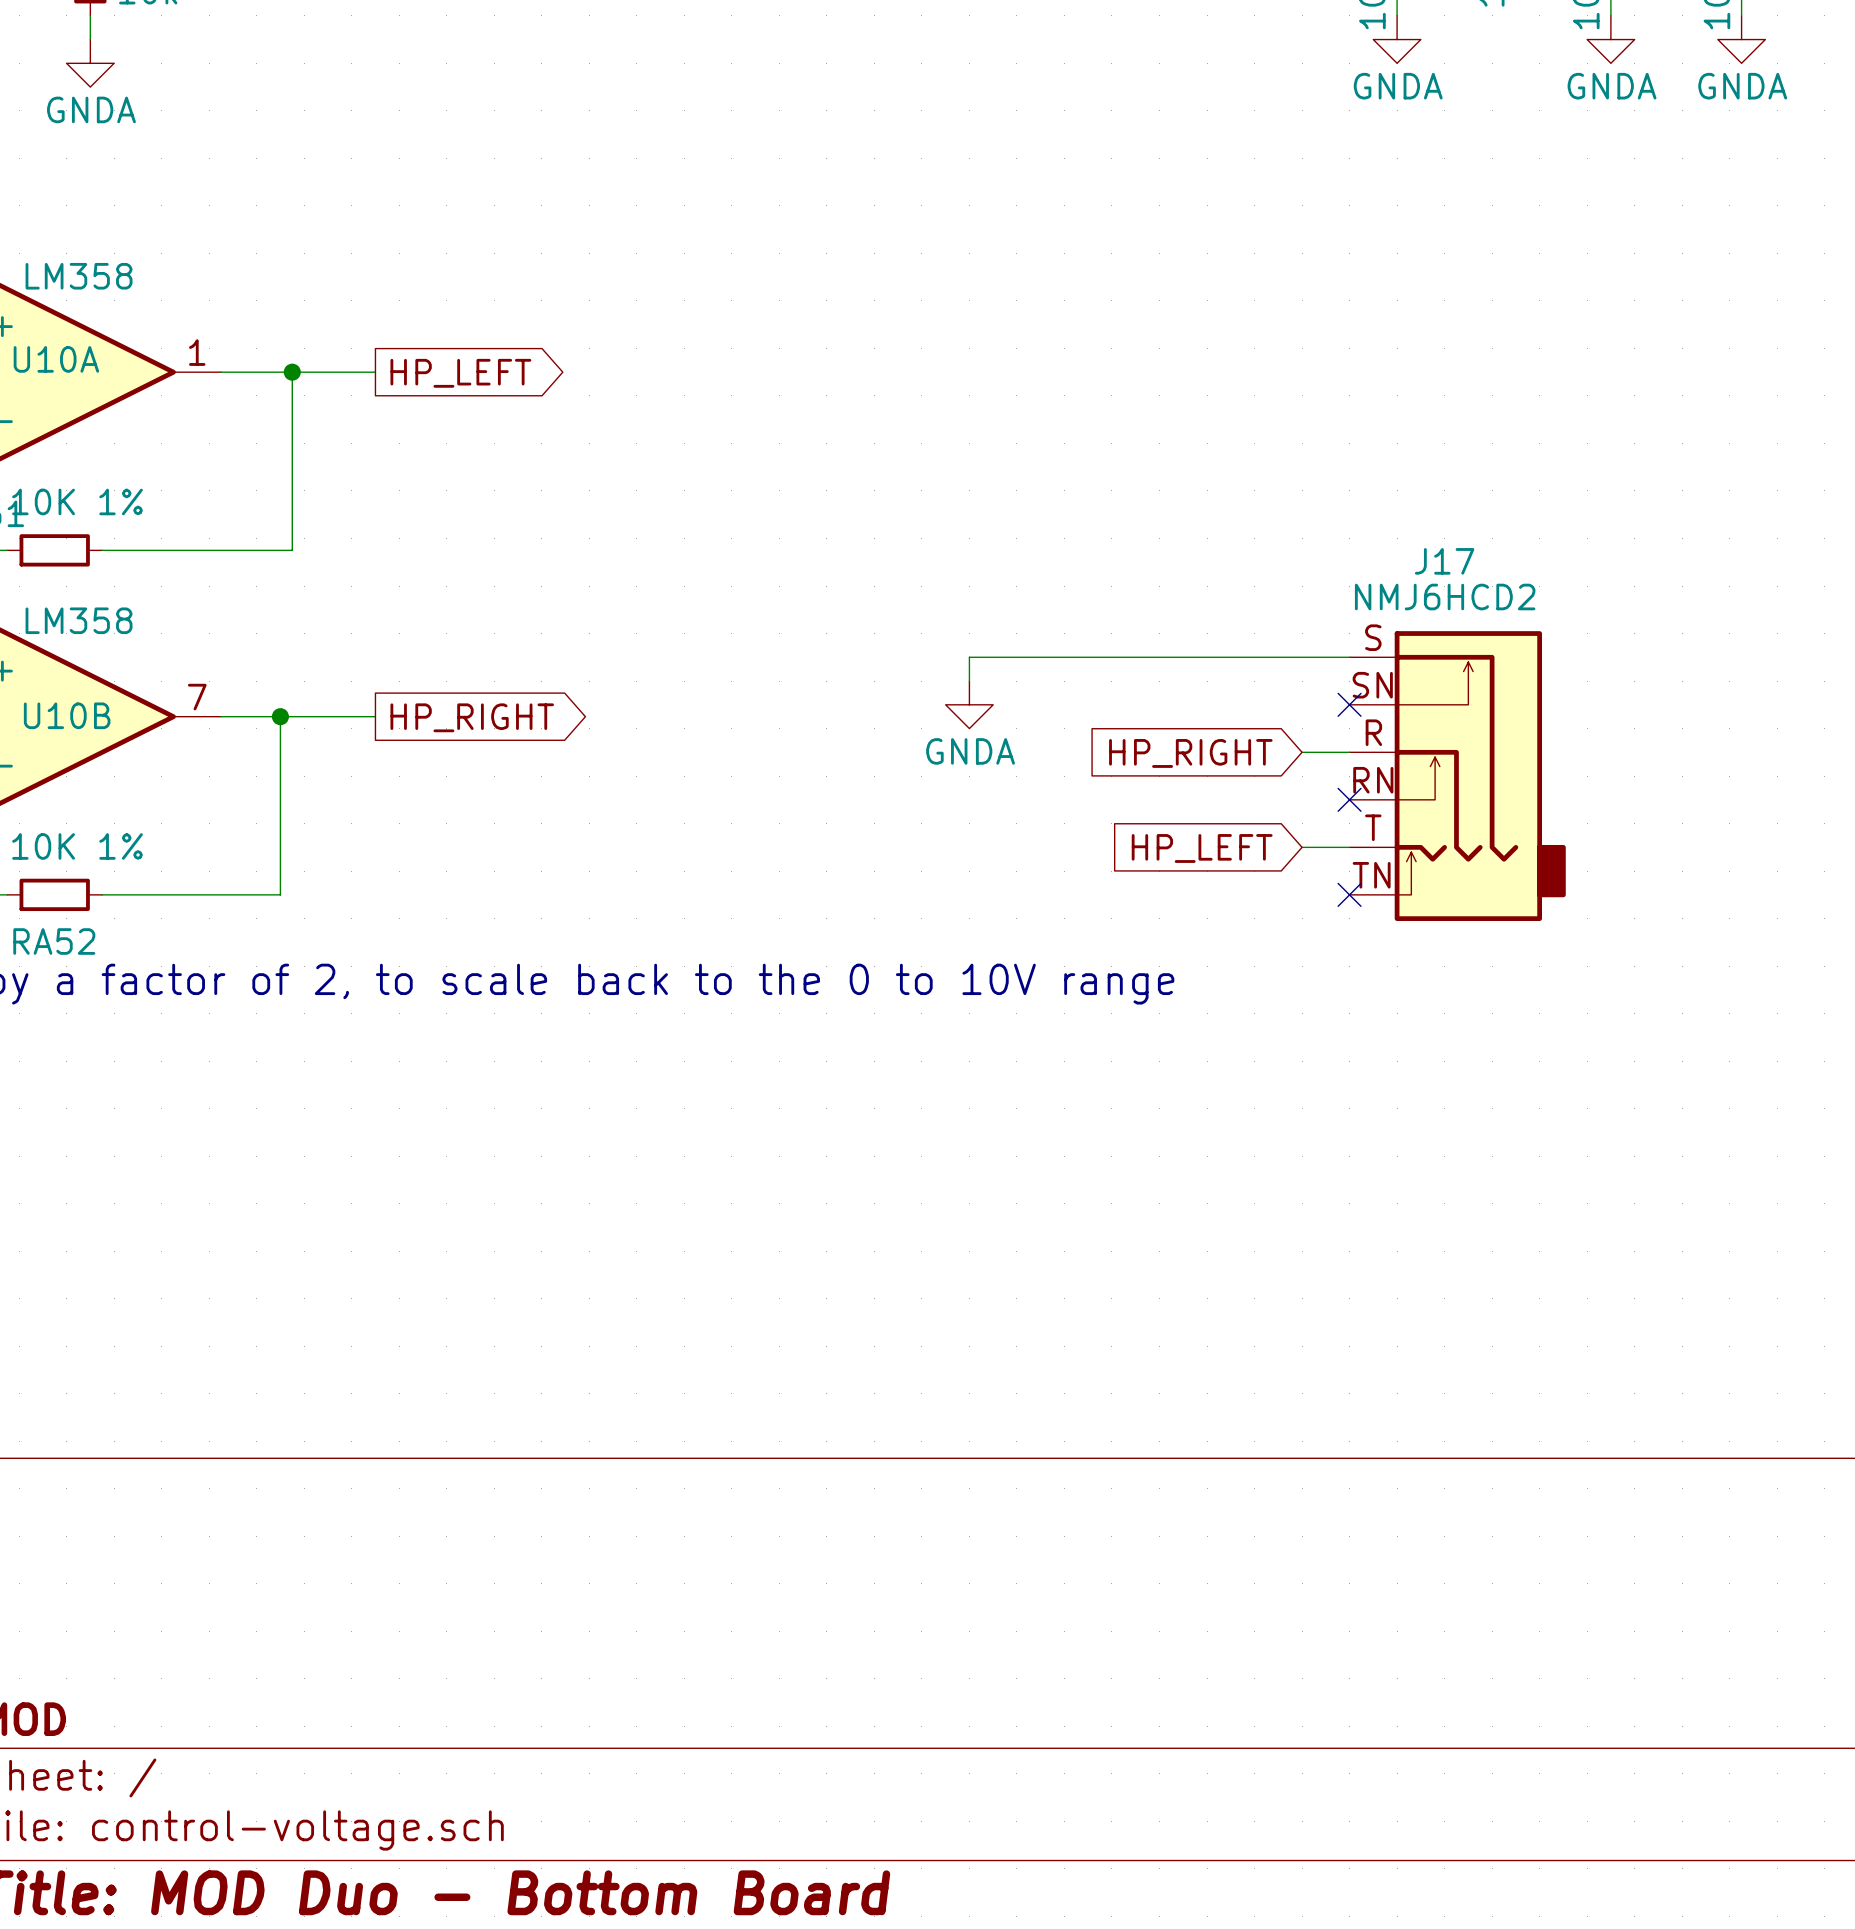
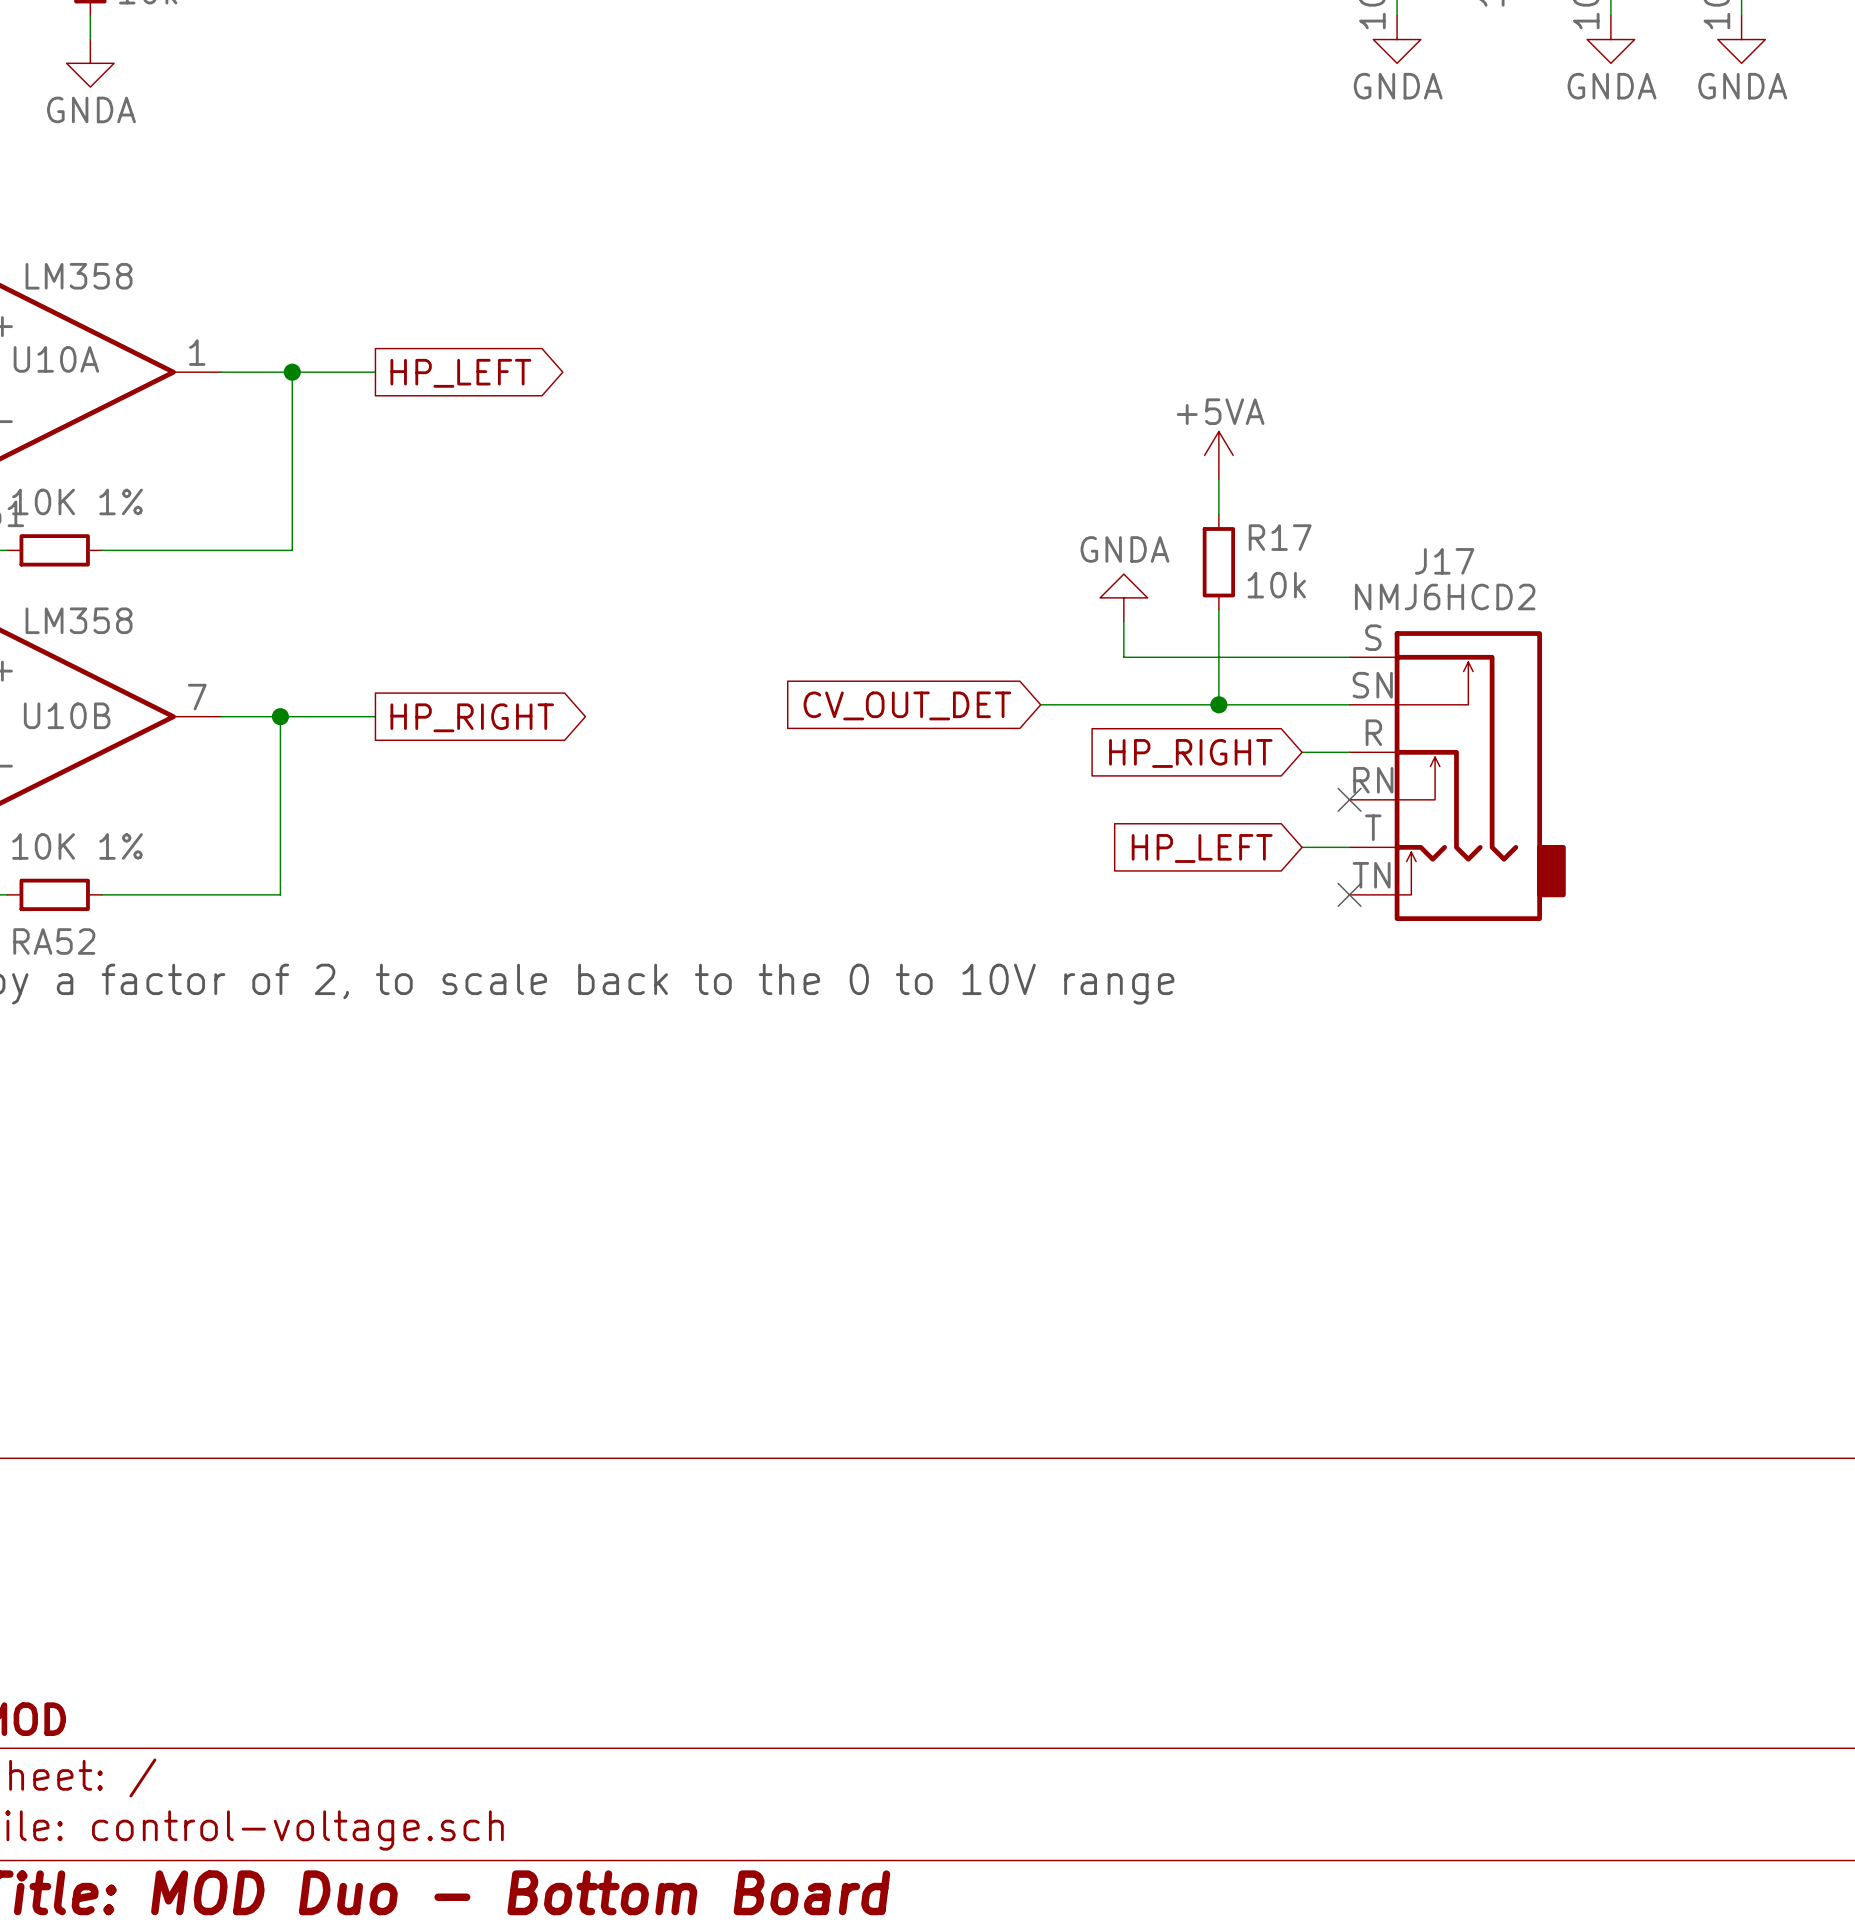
power symbol: none -> +5VA (1218, 455)
wire: none -> (1218, 479) (1218, 514)
R17: none -> 10k (1218, 562)
wire: none -> (1218, 609) (1218, 704)
wire: (1123, 657) (969, 657) (969, 681) -> (1123, 657) (1123, 621)
power symbol rotation: 0° (969, 704) -> 180° (1123, 597)
power symbol position: GNDA (969, 704) -> GNDA (1123, 597)
wire: none -> (1040, 704) (1349, 704)
junction: none -> (1218, 704)
no-connect mark: (1349, 704) -> none
global label: none -> CV_OUT_DET (907, 705)

